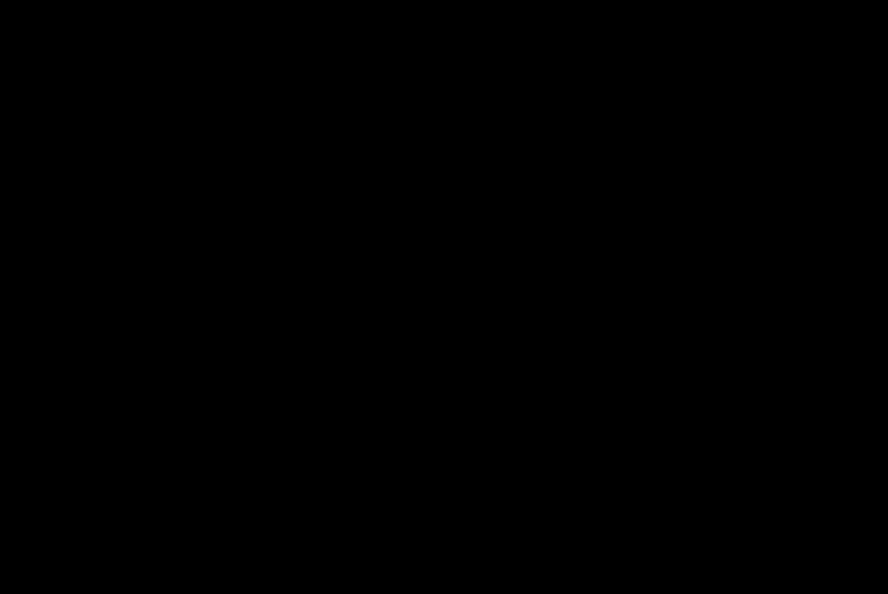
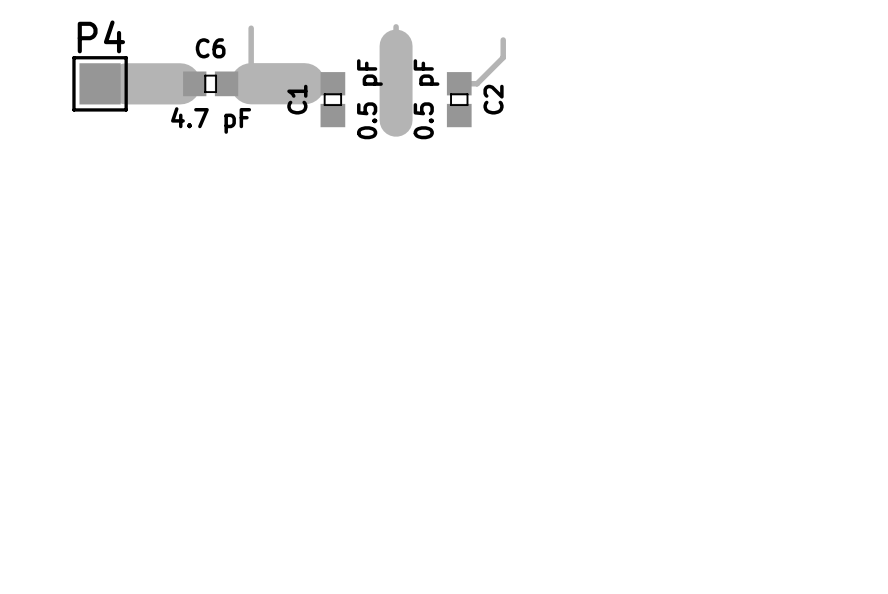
track: none -> (396, 26) (396, 120)
track: none -> (251, 28) (251, 83) (304, 83)
track: none -> (503, 40) (503, 57) (477, 83) (459, 83)
P4: none -> (100, 83)
track: none -> (126, 83) (180, 83)
C6: none -> 4.7 pF (210, 83)
C1: none -> 0.5 pF (332, 99)
C2: none -> 0.5 pF (459, 99)

